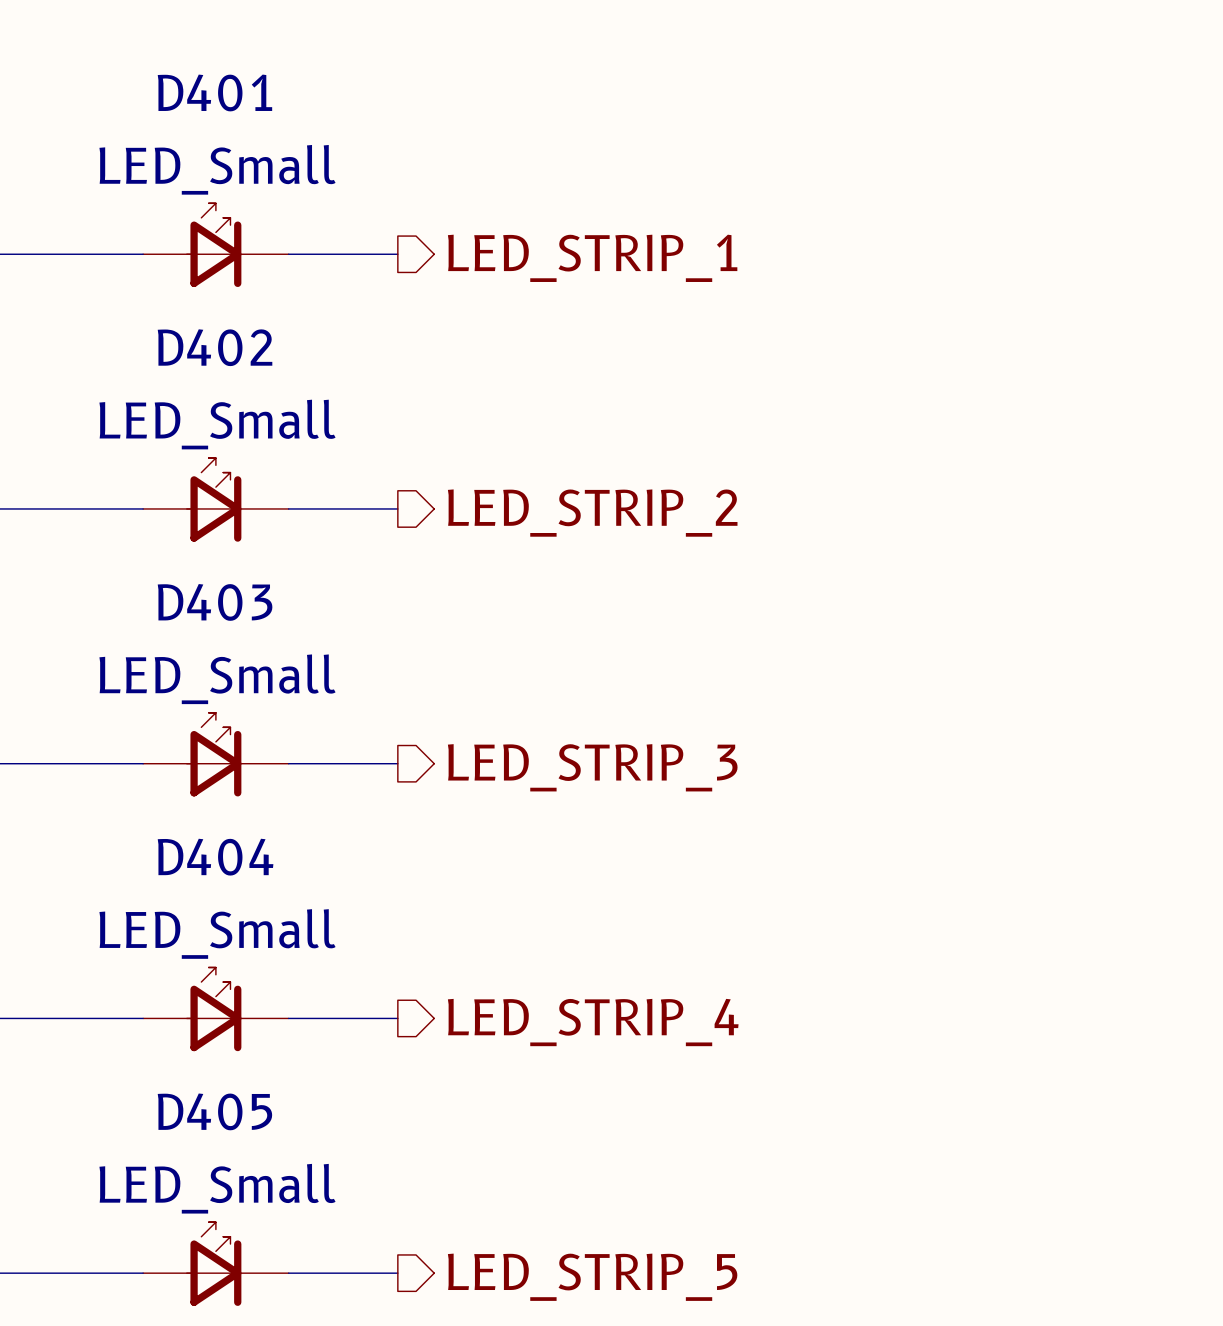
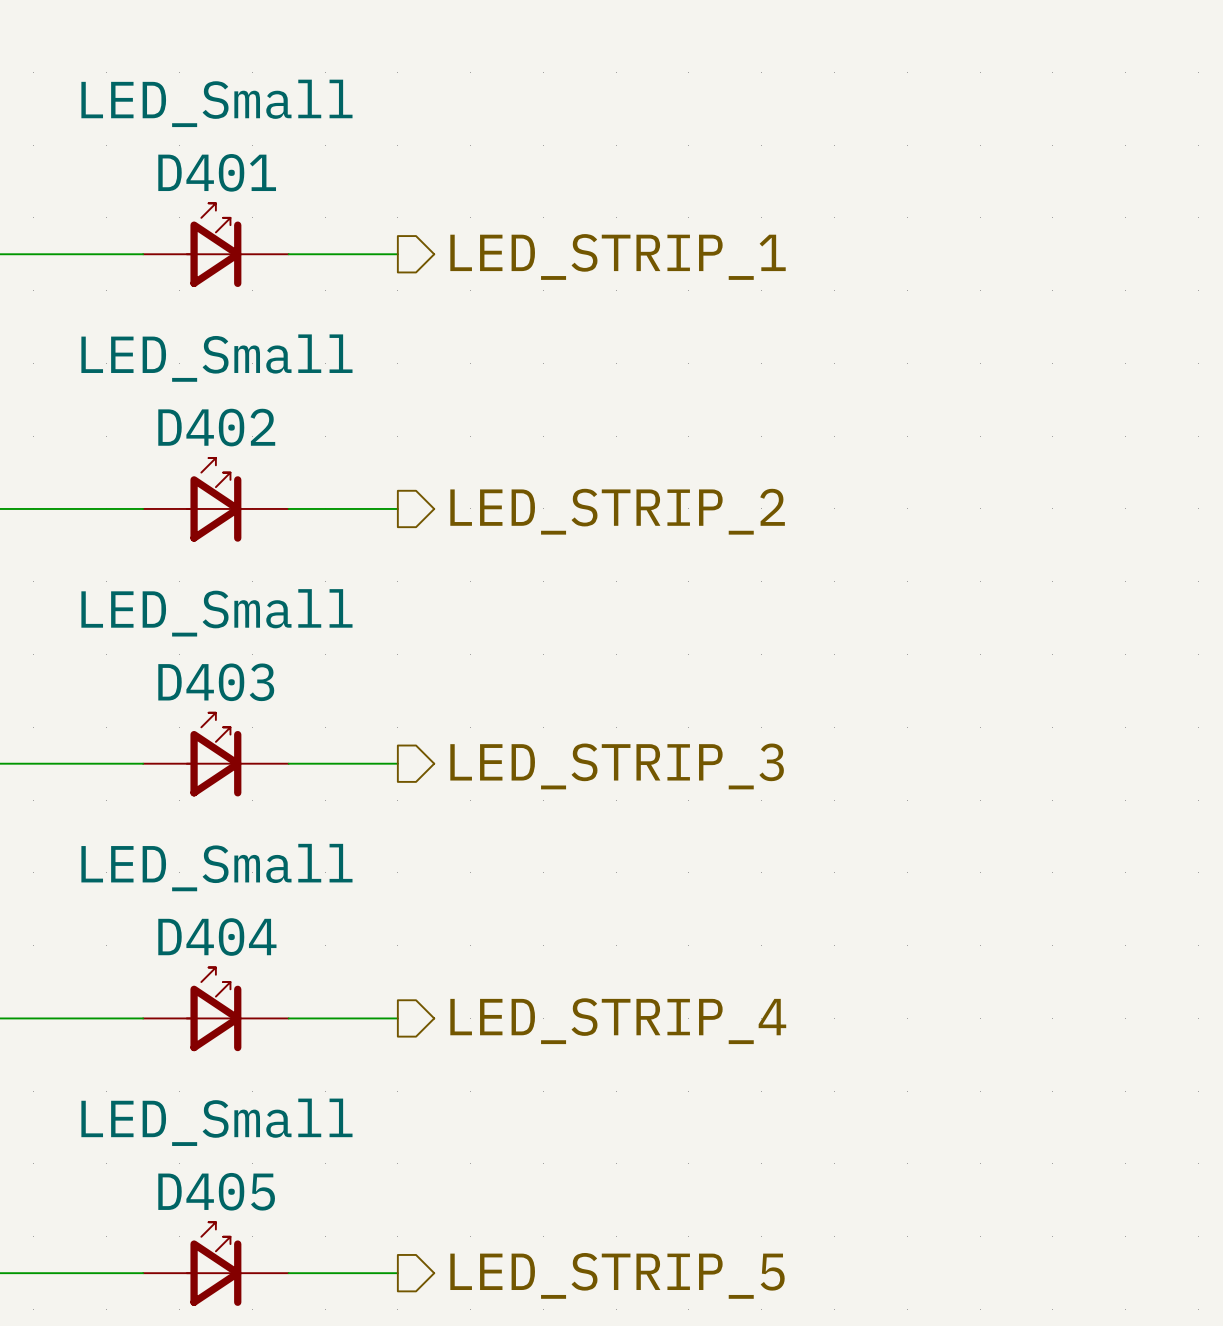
D401 name position: D401 (214, 92) -> D401 (217, 172)
D401 value position: LED_Small (217, 169) -> LED_Small (216, 103)
D402 name position: D402 (215, 347) -> D402 (216, 427)
D402 value position: LED_Small (217, 424) -> LED_Small (216, 358)
D403 name position: D403 (215, 602) -> D403 (216, 682)
D403 value position: LED_Small (217, 679) -> LED_Small (216, 612)
D404 name position: D404 (215, 857) -> D404 (217, 937)
D404 value position: LED_Small (217, 933) -> LED_Small (216, 867)
D405 name position: D405 (214, 1111) -> D405 (216, 1191)
D405 value position: LED_Small (217, 1188) -> LED_Small (216, 1122)

